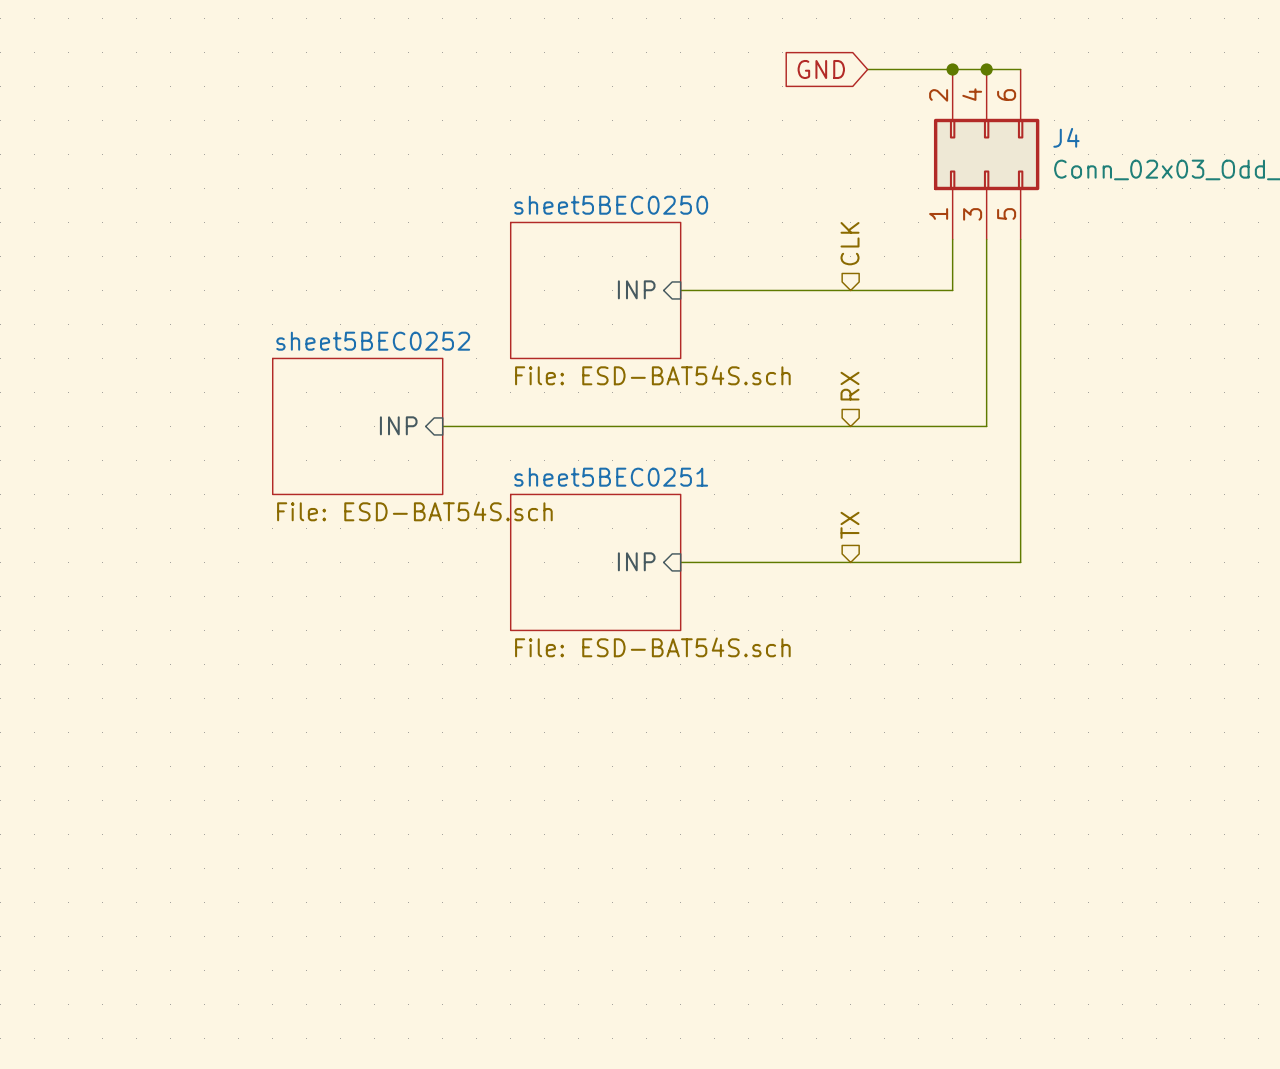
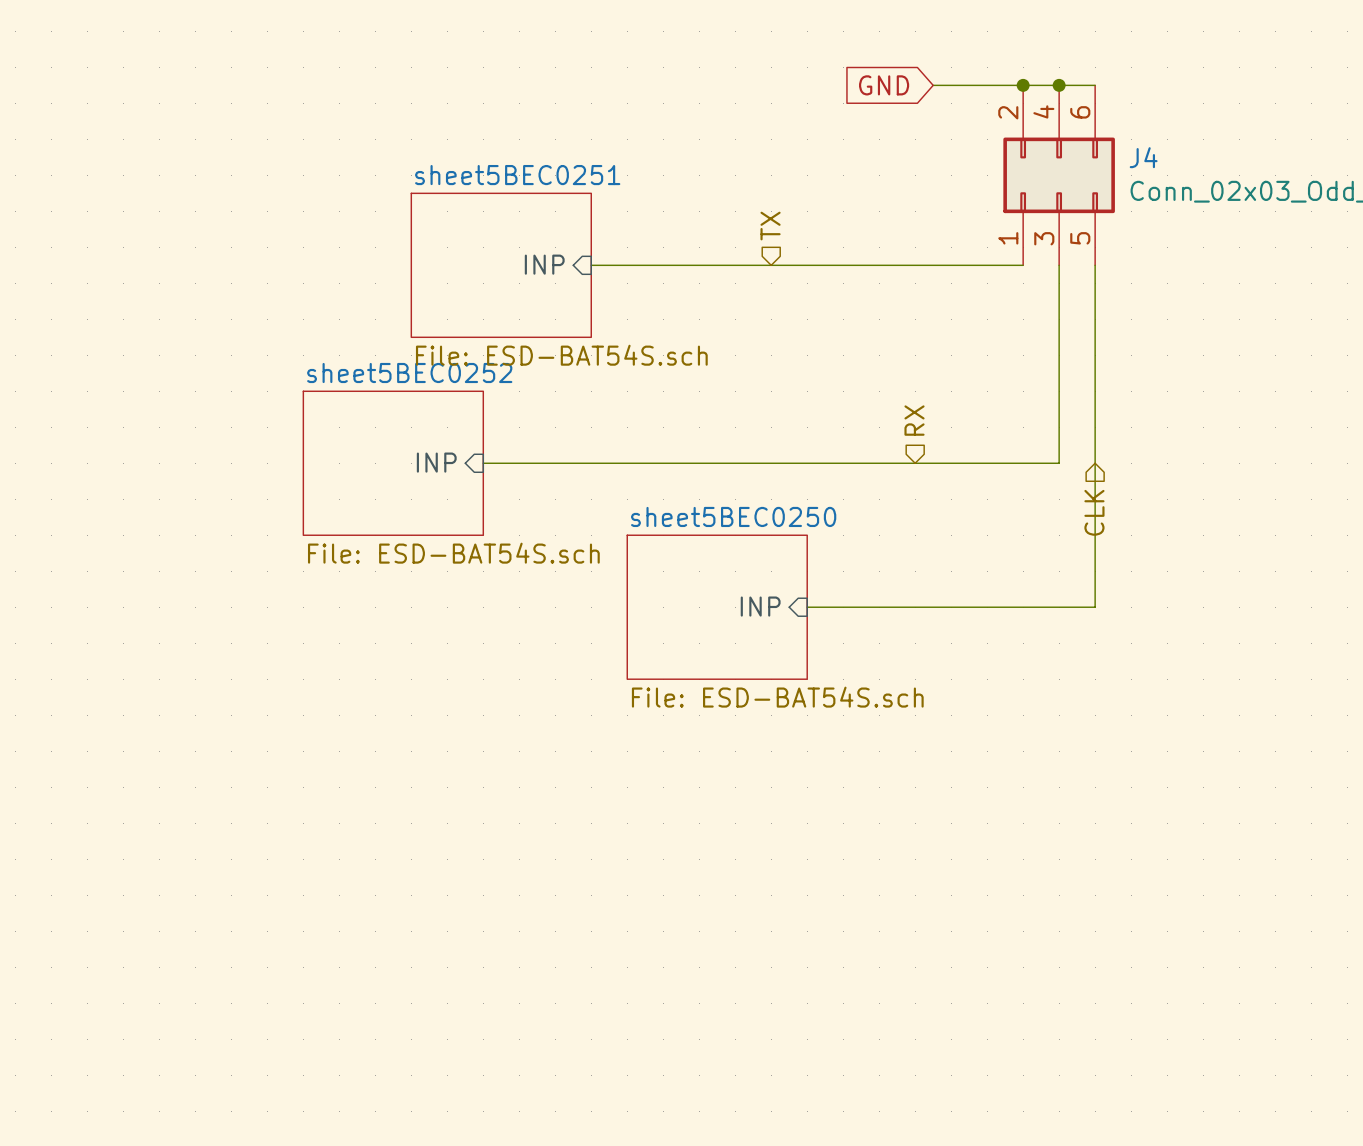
hierarchical label: none -> TX (770, 226)
sheet pin: none -> INP (544, 264)
wire: (952, 239) (952, 290) (680, 290) -> (1023, 265) (591, 265)
hierarchical label rotation: 0° (850, 243) -> 180° (1094, 512)
hierarchical label position: CLK (850, 243) -> CLK (1094, 512)
sheet pin: INP (636, 289) -> none
sheet sheet5BEC0250 position: (595, 290) -> (717, 607)
hierarchical label: TX (850, 525) -> none
sheet pin position: INP (636, 561) -> INP (760, 606)
sheet sheet5BEC0251 position: (595, 562) -> (501, 265)
wire: (680, 562) (748, 562) -> none

